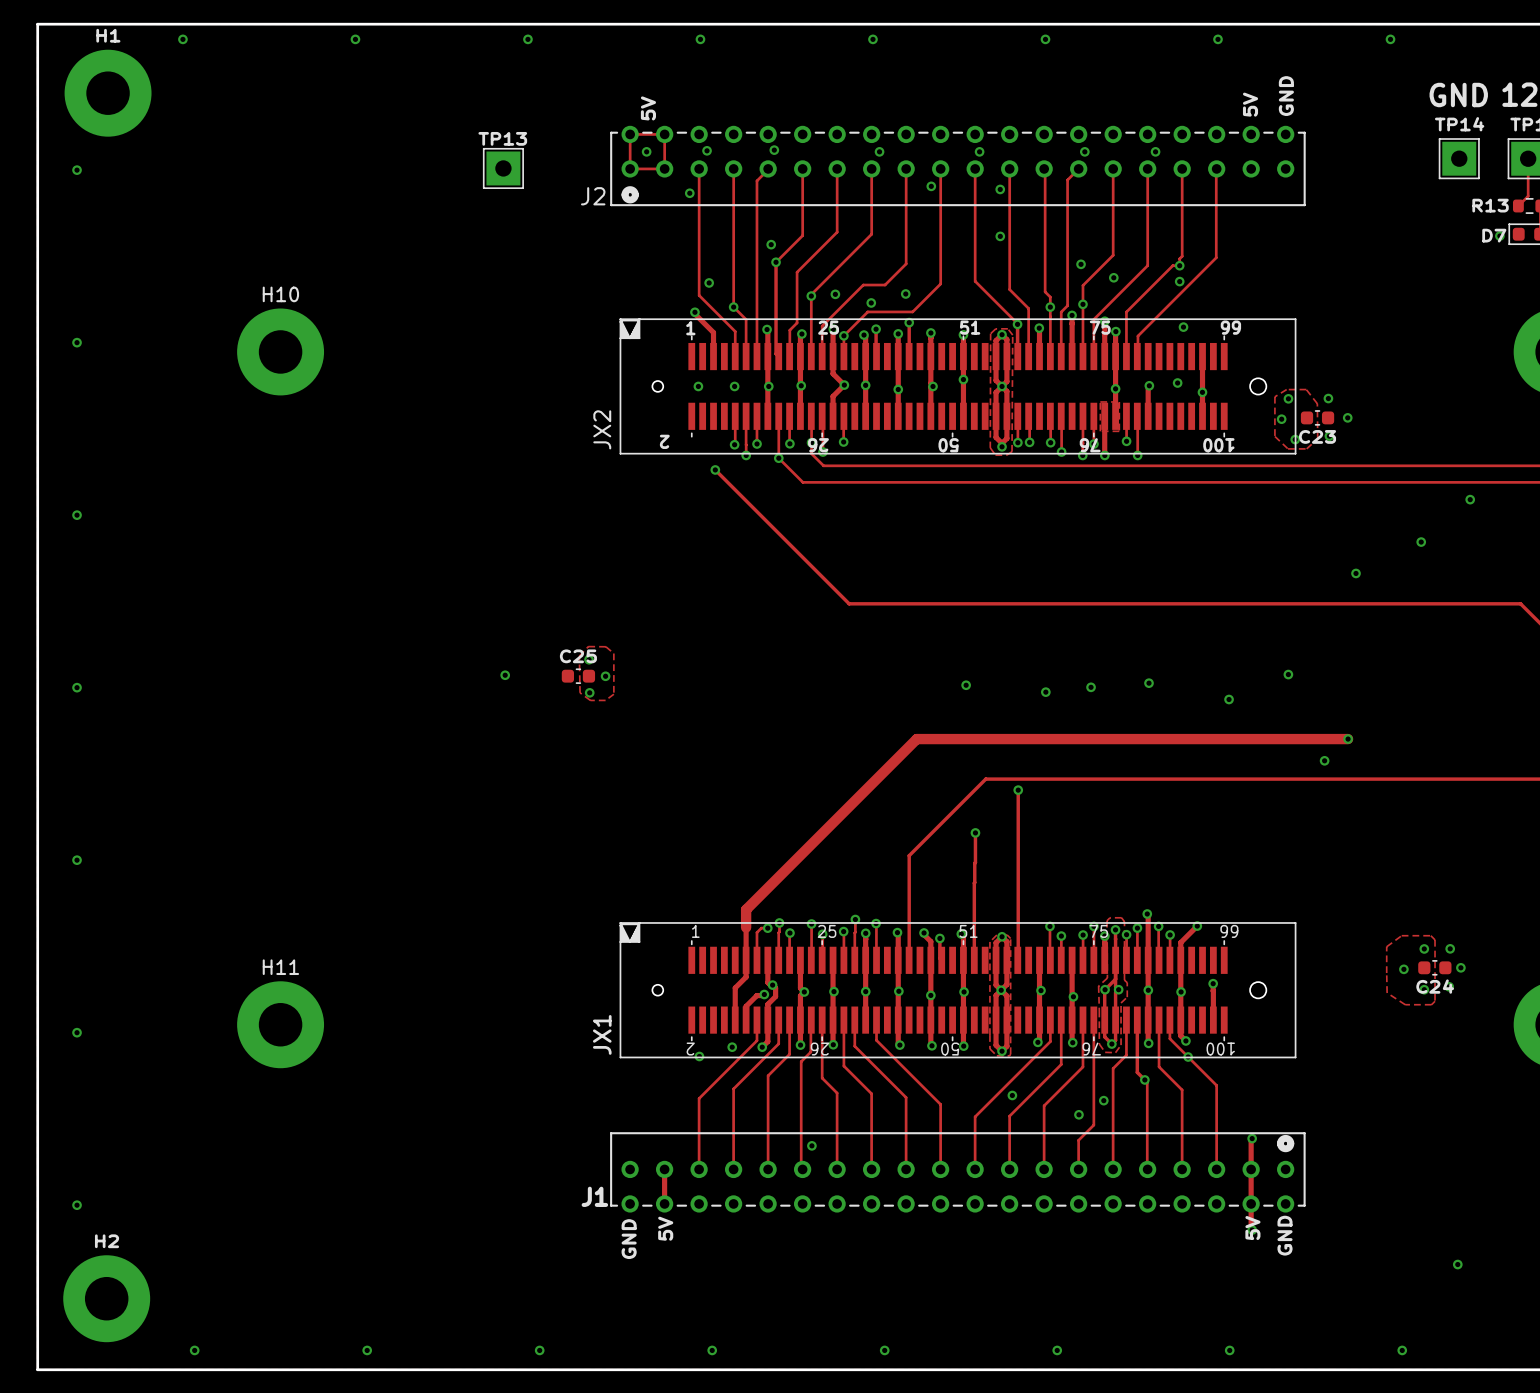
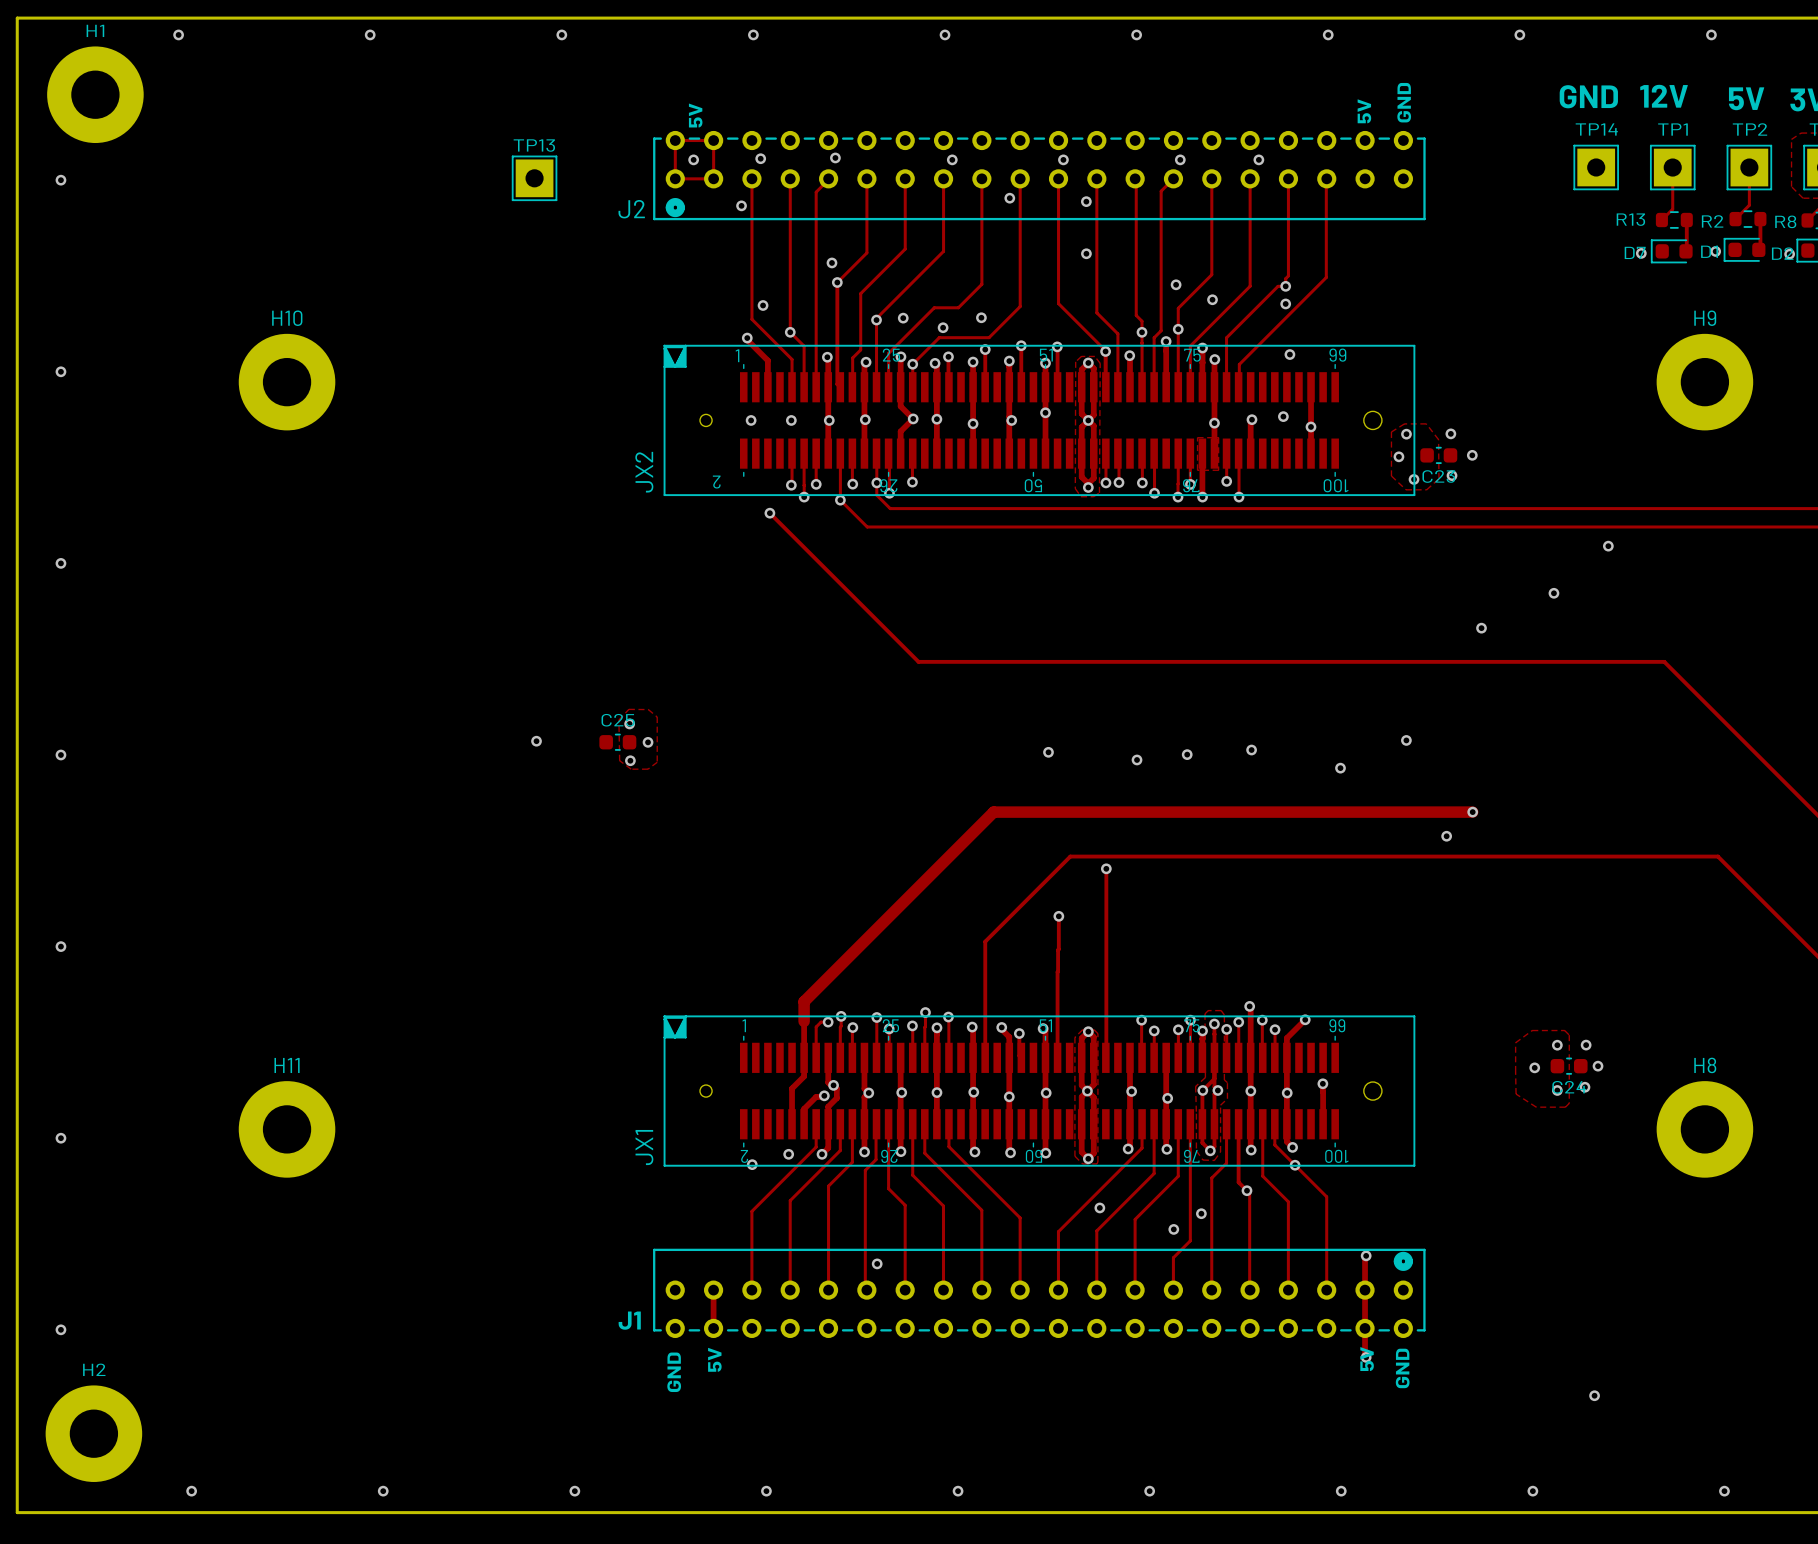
track: none -> (1021, 345) (1021, 387)
via: none -> (1021, 345)
track: none -> (1057, 346) (1057, 387)
via: none -> (1057, 346)

